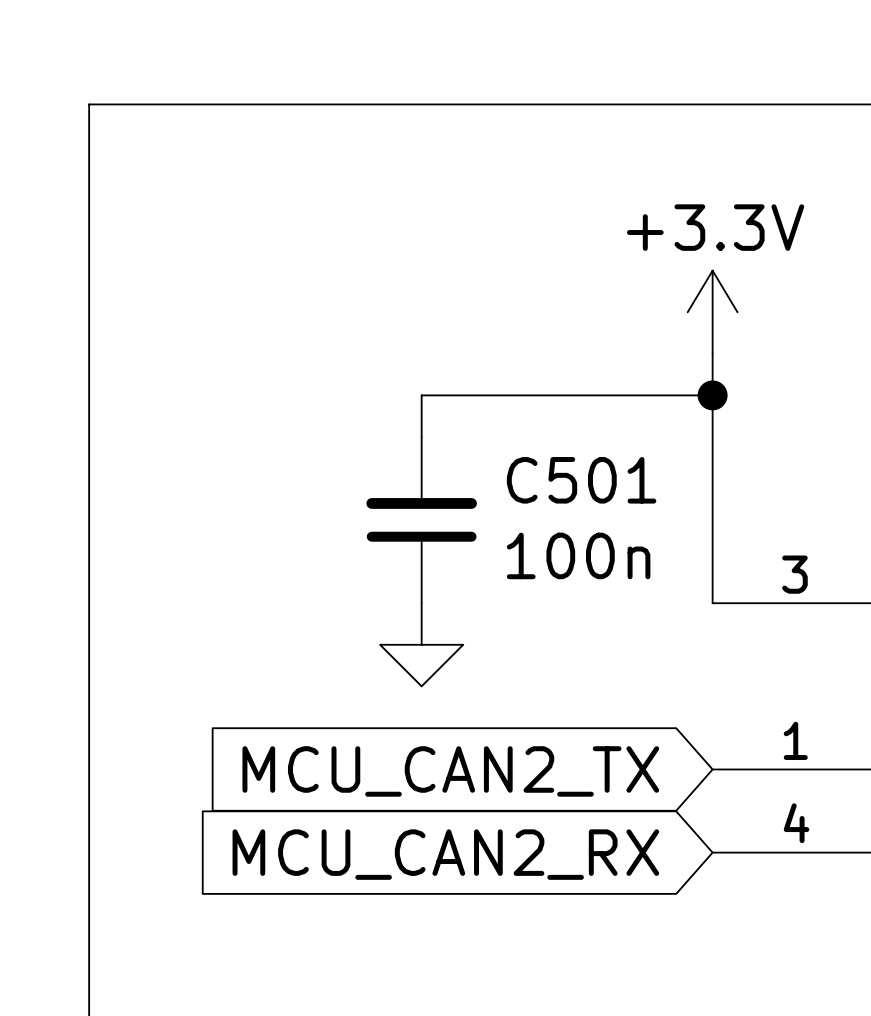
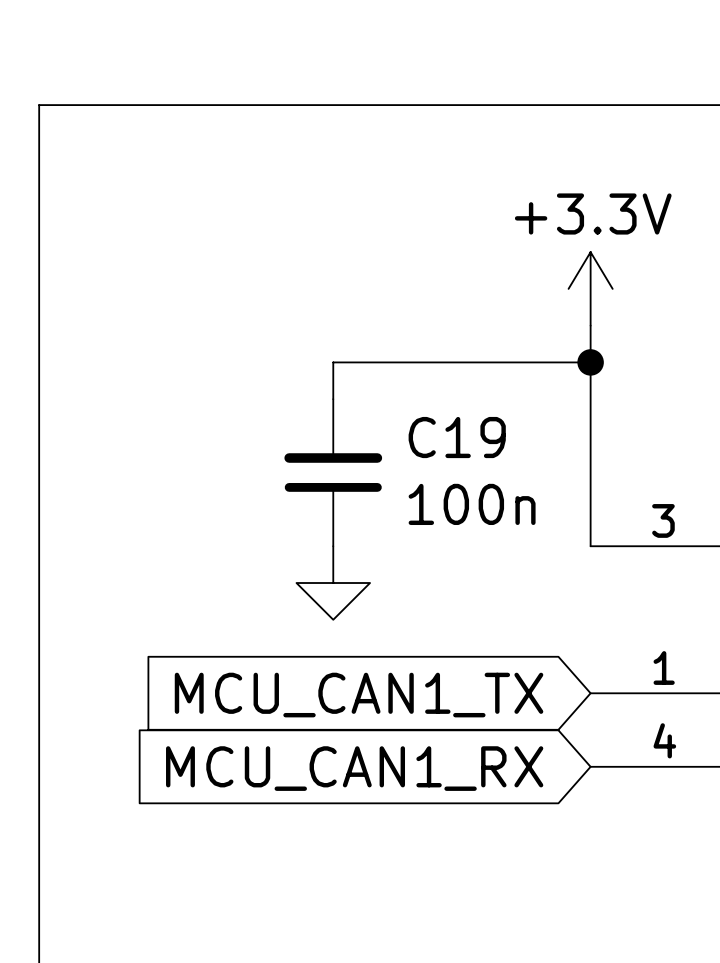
C501 name: C501 (581, 480) -> C19 (457, 437)
global label: MCU_CAN2_TX (450, 771) -> MCU_CAN1_TX (359, 695)
global label: MCU_CAN2_RX (445, 854) -> MCU_CAN1_RX (354, 768)

